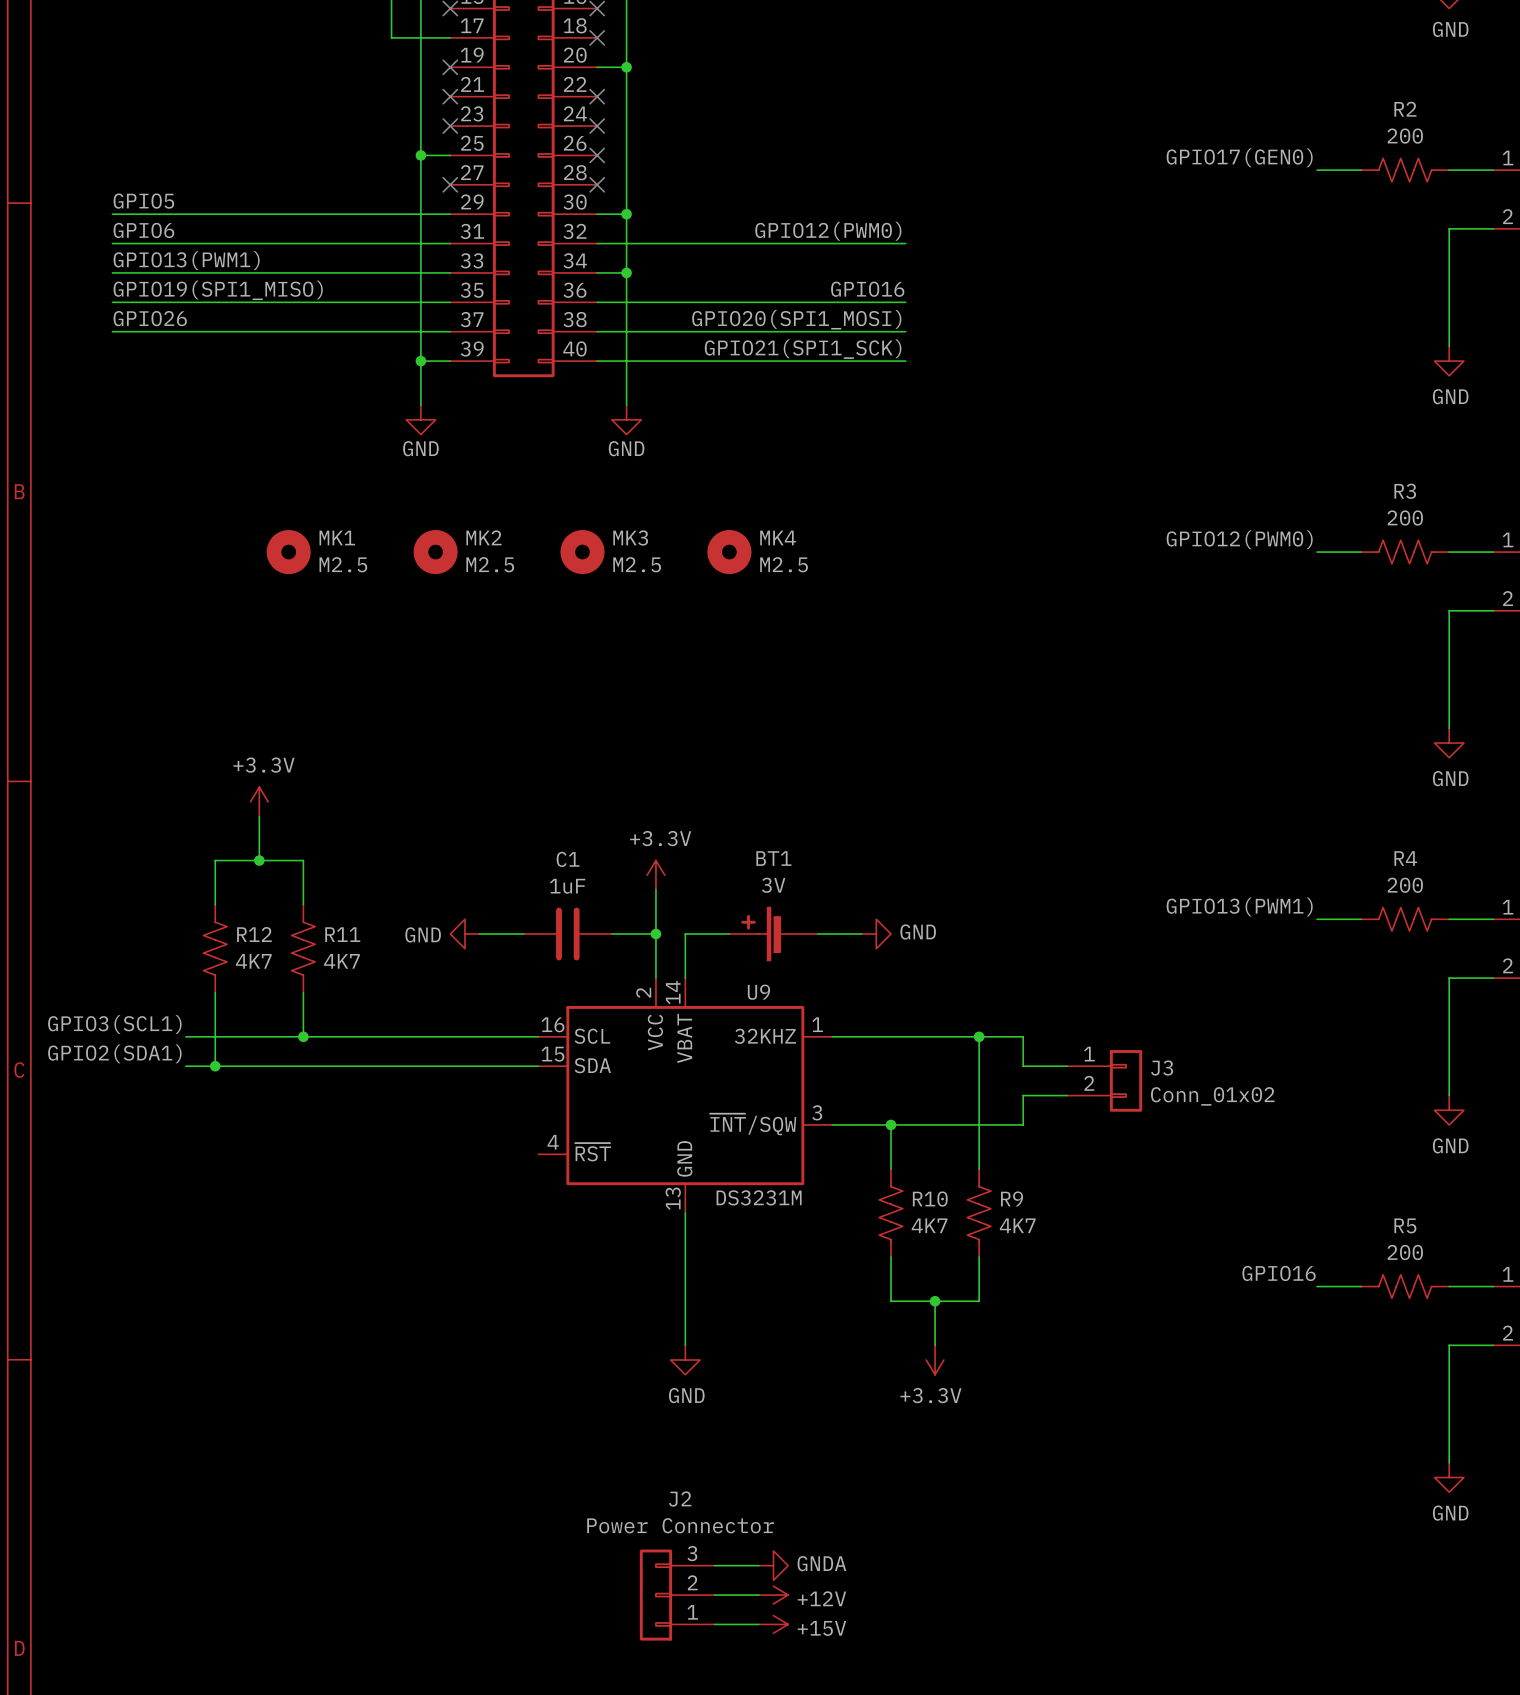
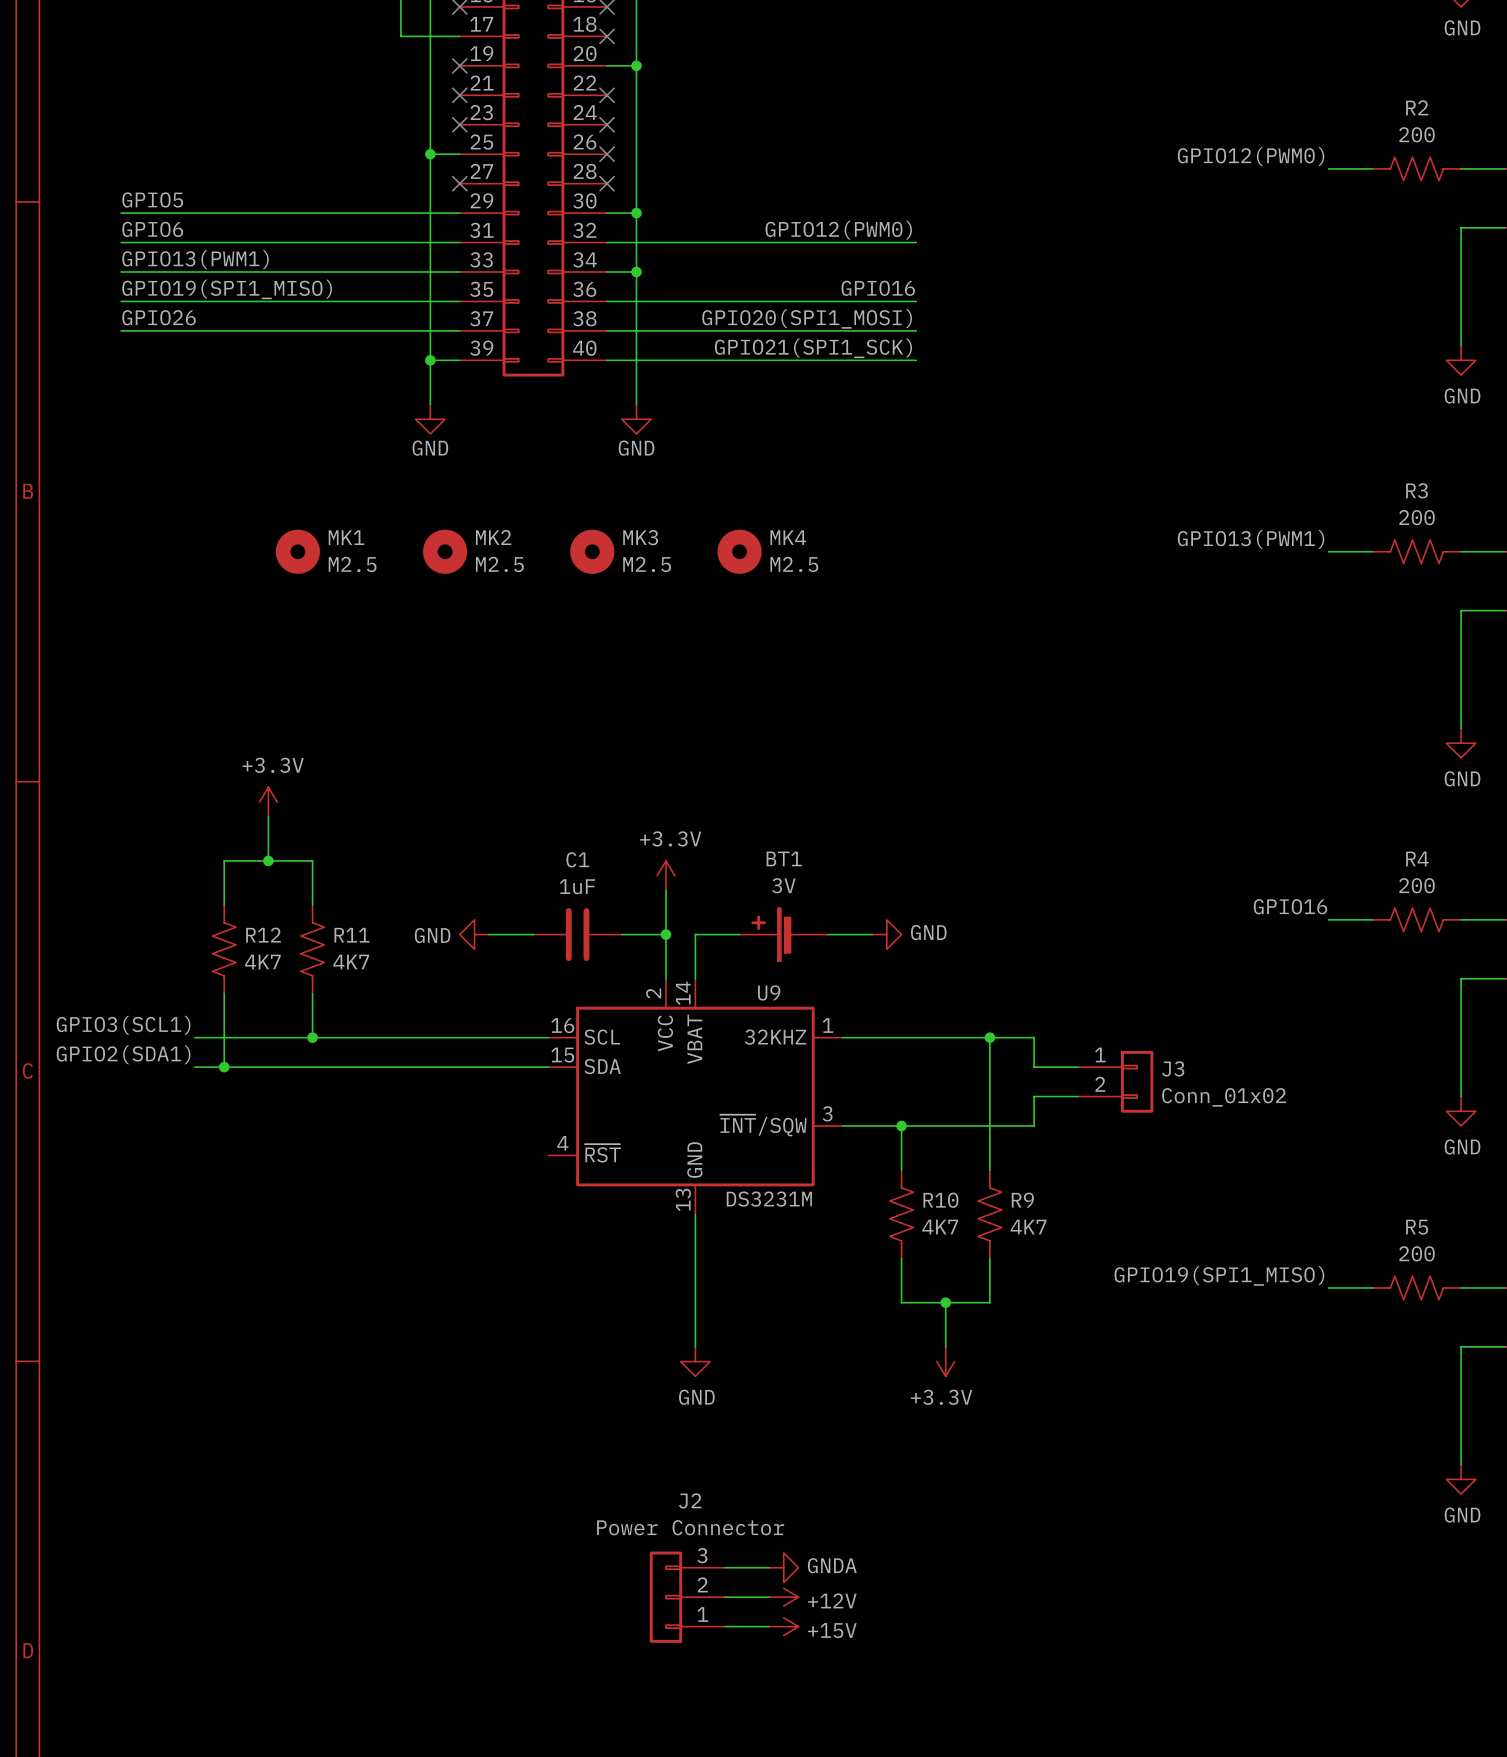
label: GPIO17(GEN0) (1239, 157) -> GPIO12(PWM0) (1251, 156)
label: GPIO12(PWM0) (1239, 539) -> GPIO13(PWM1) (1251, 539)
label: GPIO13(PWM1) (1239, 907) -> GPIO16 (1290, 906)
label: GPIO16 (1279, 1273) -> GPIO19(SPI1_MISO) (1219, 1275)

